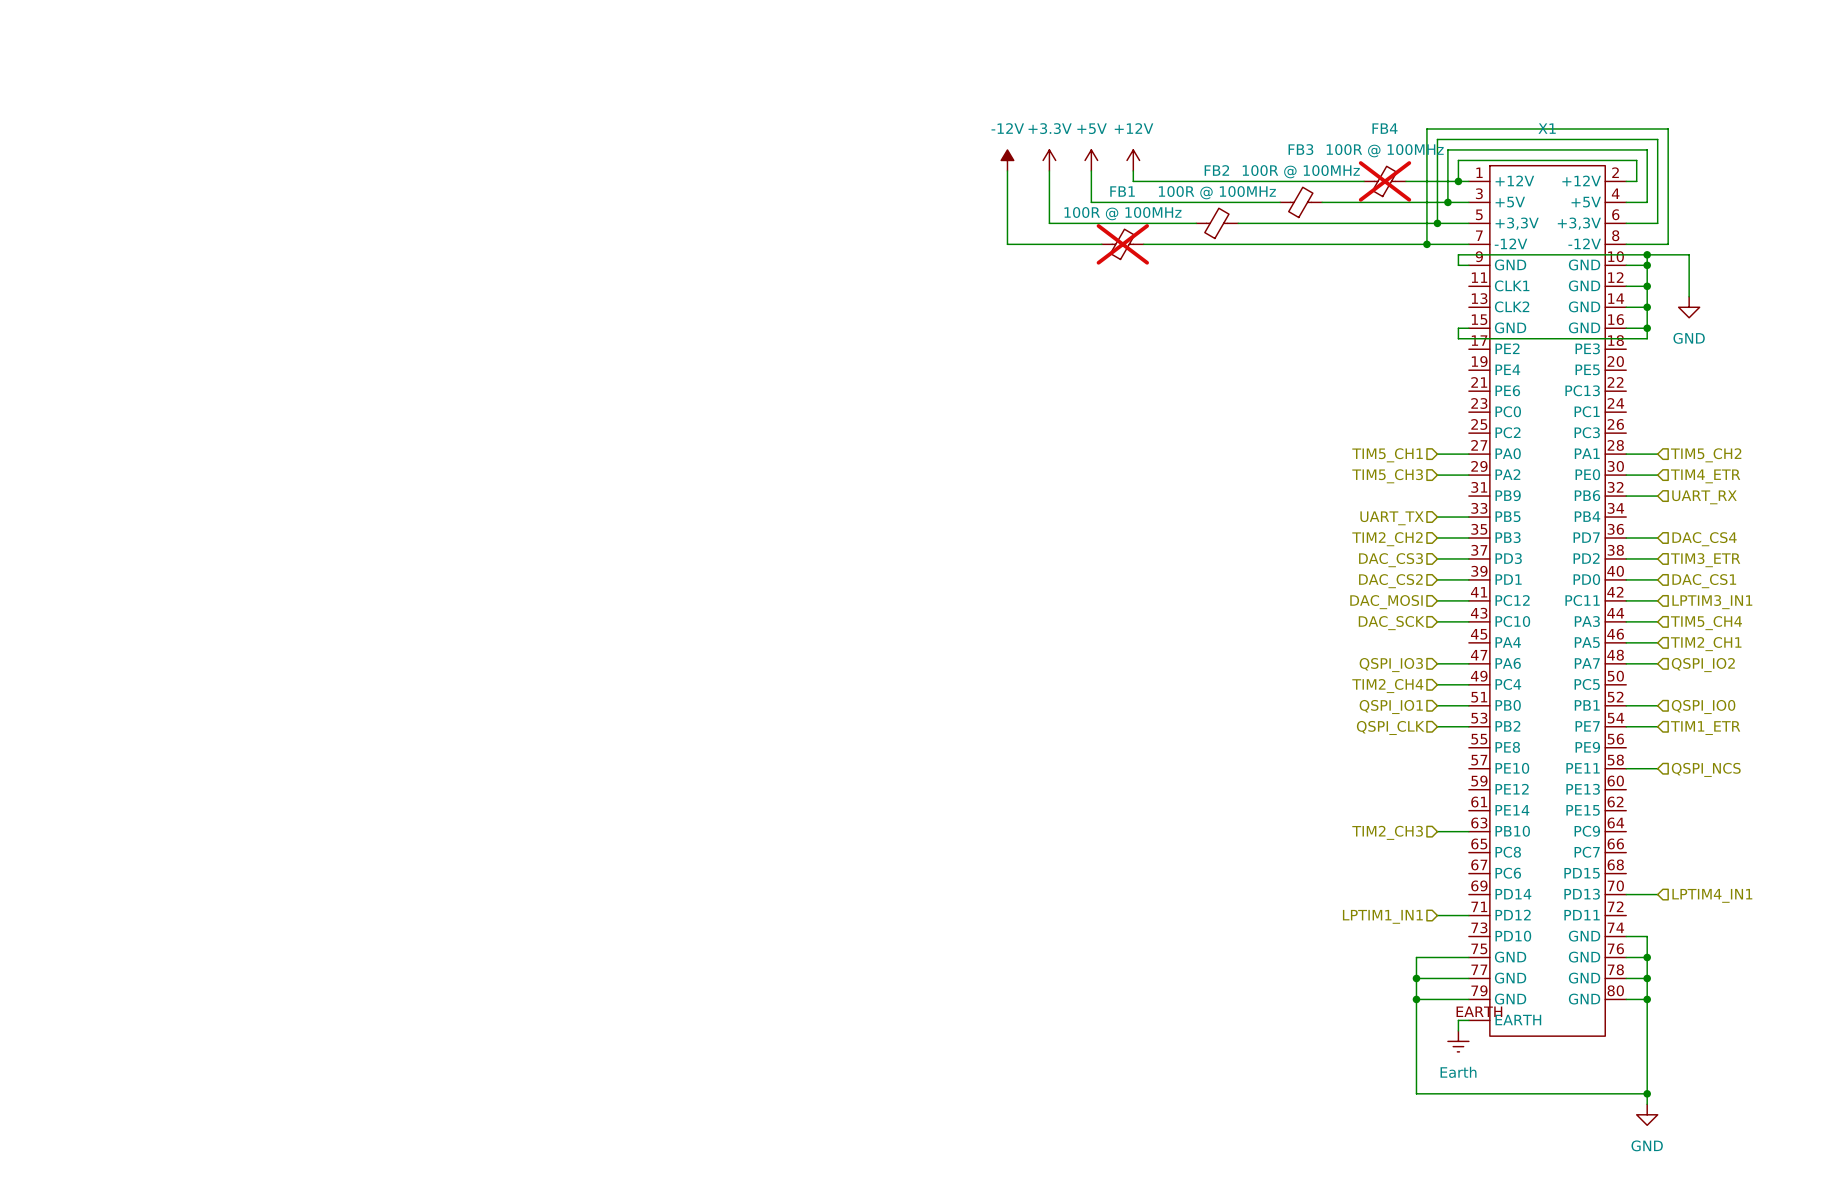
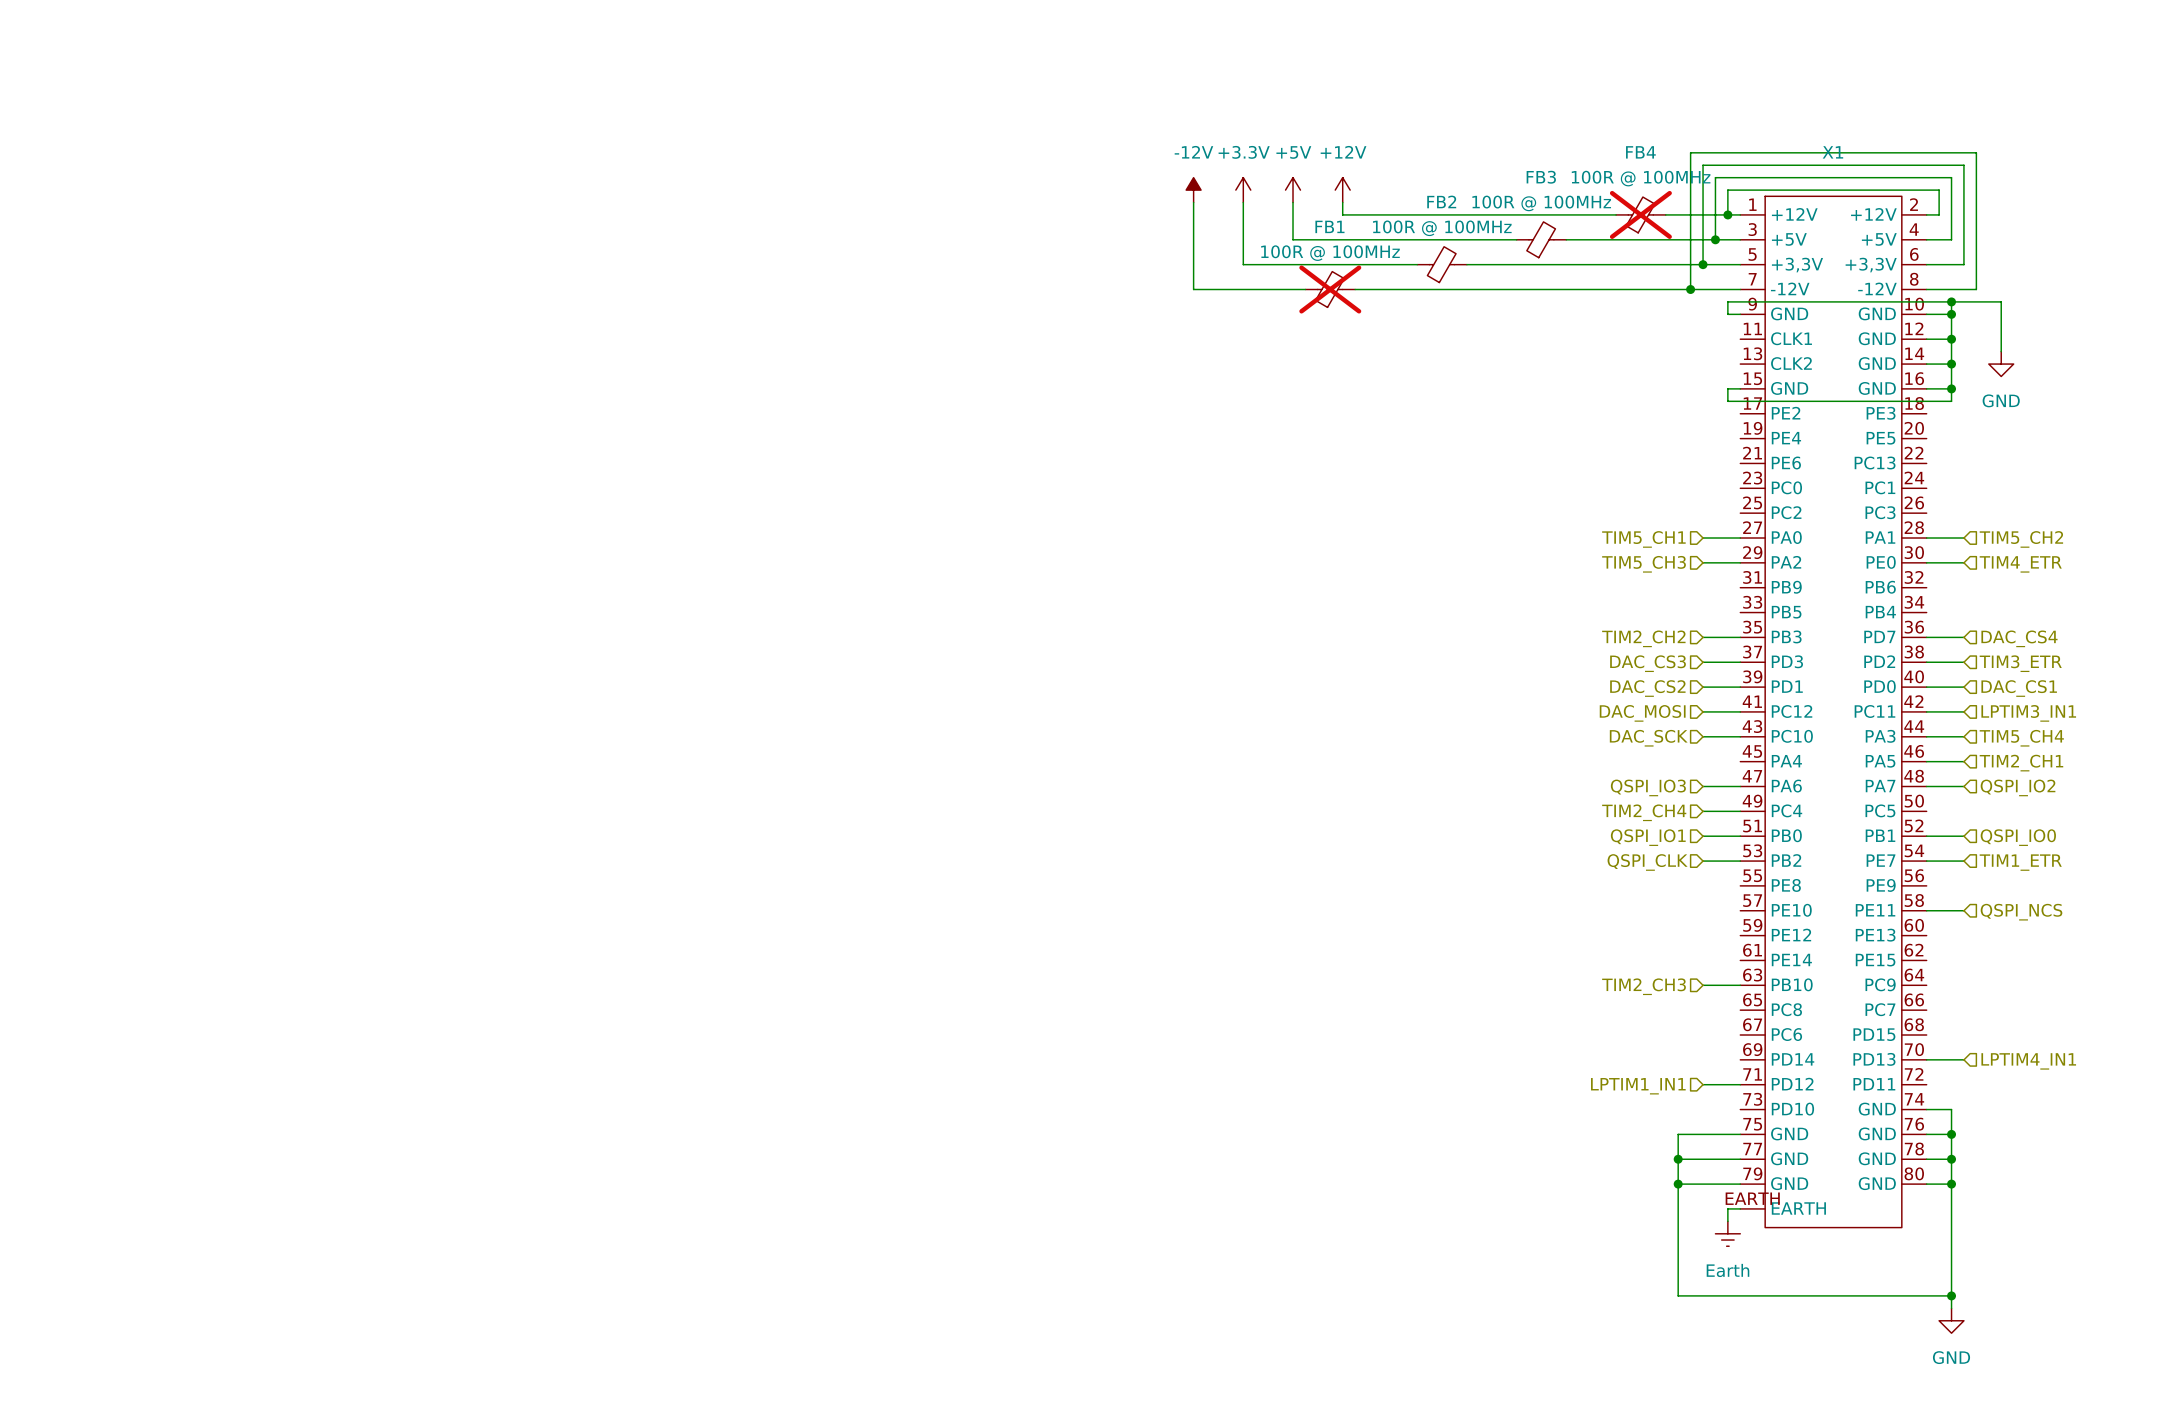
wire: (1626, 496) (1657, 496) -> none
hierarchical label: UART_RX (1704, 497) -> none
wire: (1437, 517) (1468, 517) -> none
hierarchical label: UART_TX (1392, 518) -> none

